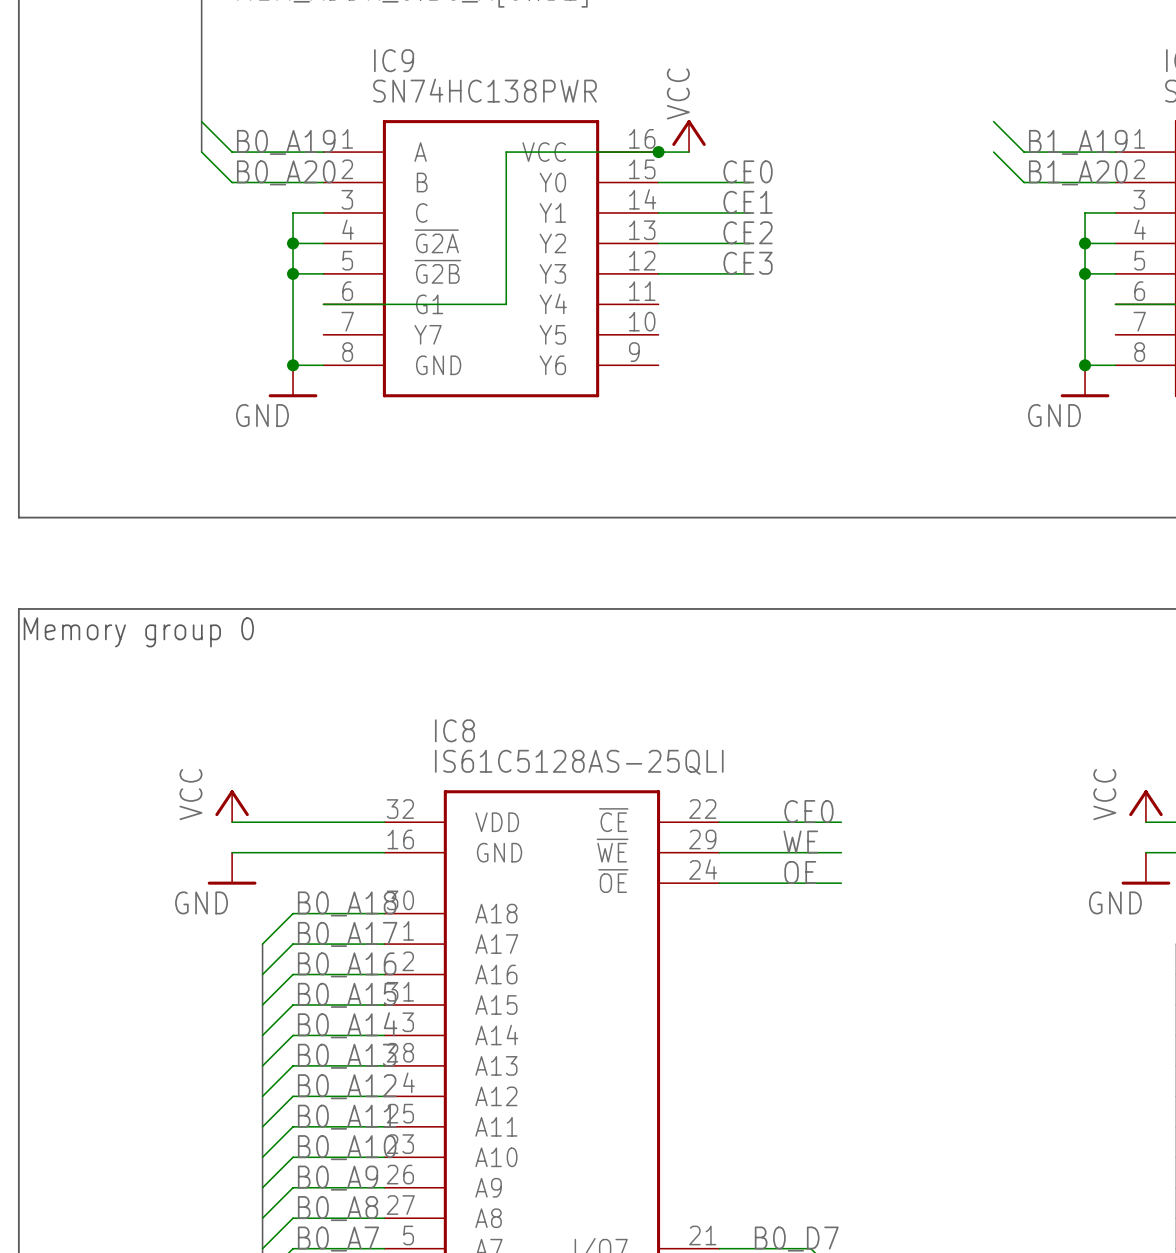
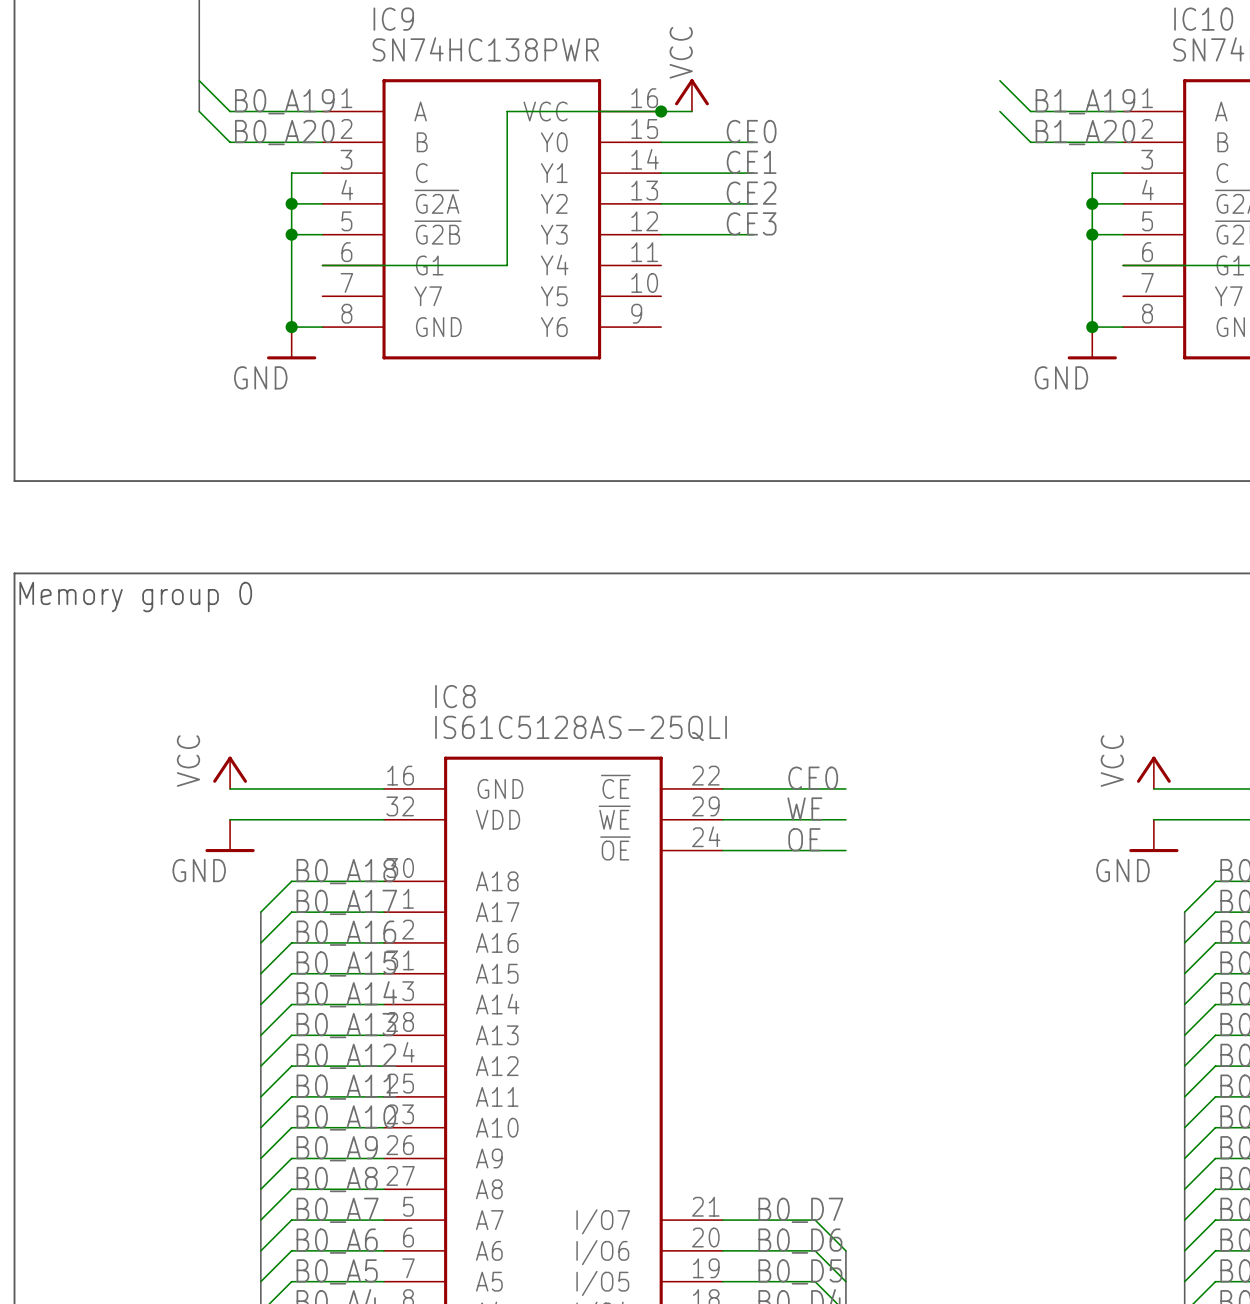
IC8 pin number: 32 (400, 809) -> 16 (400, 775)
IC8 pin name: VDD (497, 822) -> GND (500, 788)
IC8 pin number: 16 (400, 839) -> 32 (400, 806)
IC8 pin name: GND (499, 852) -> VDD (498, 819)

